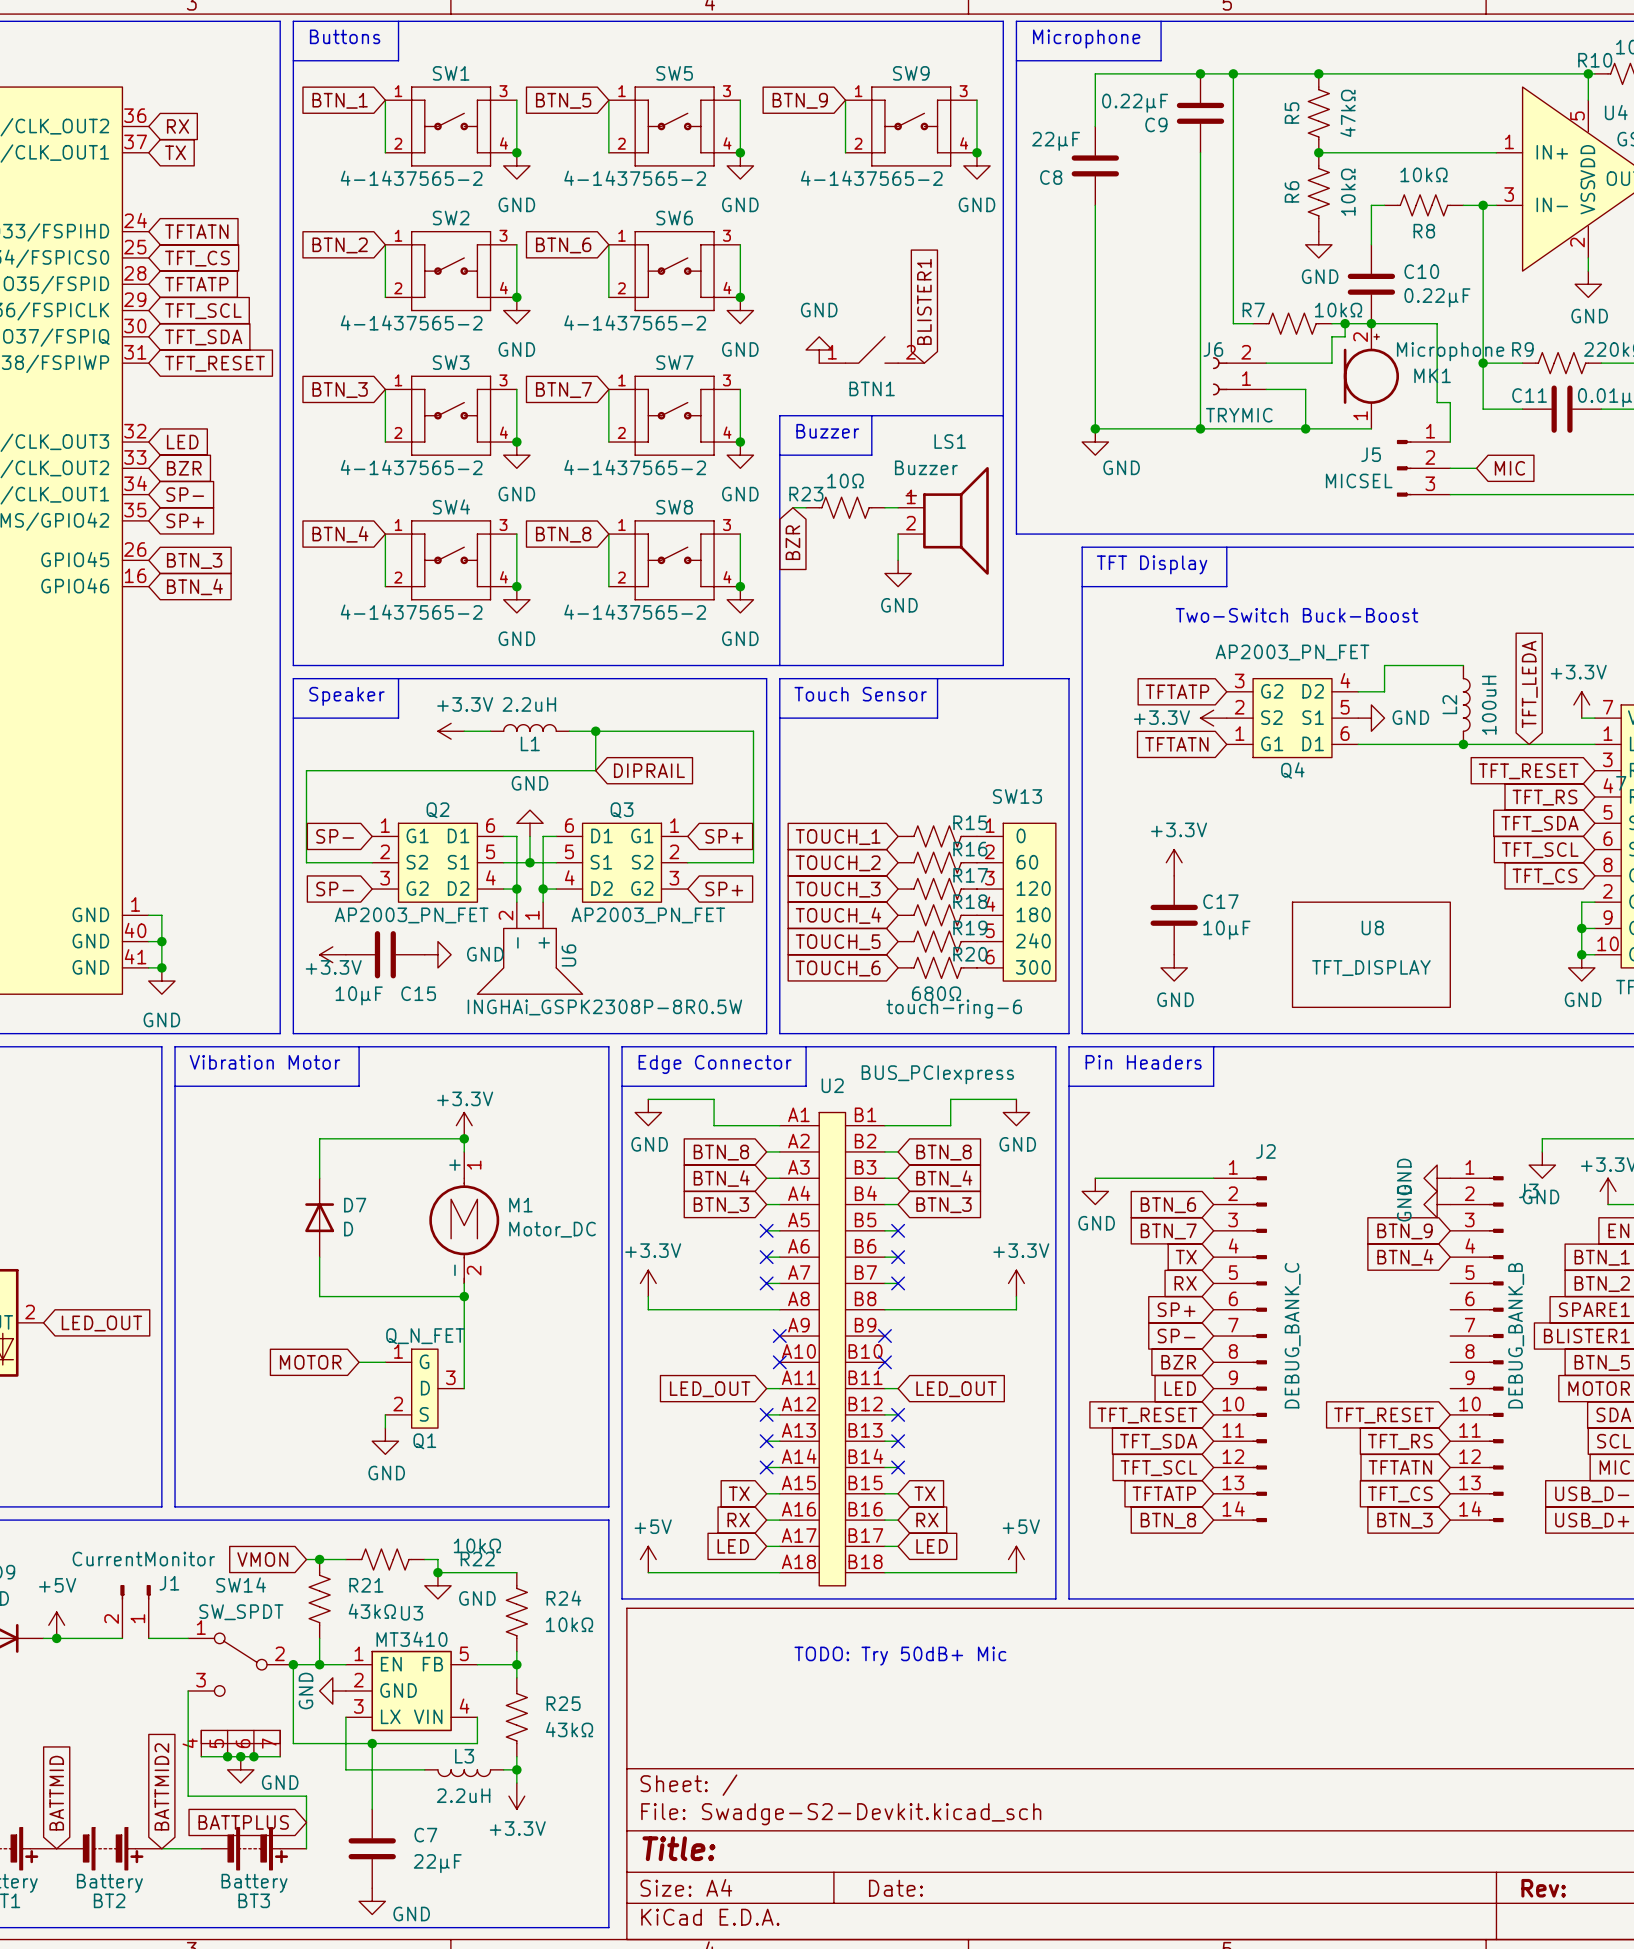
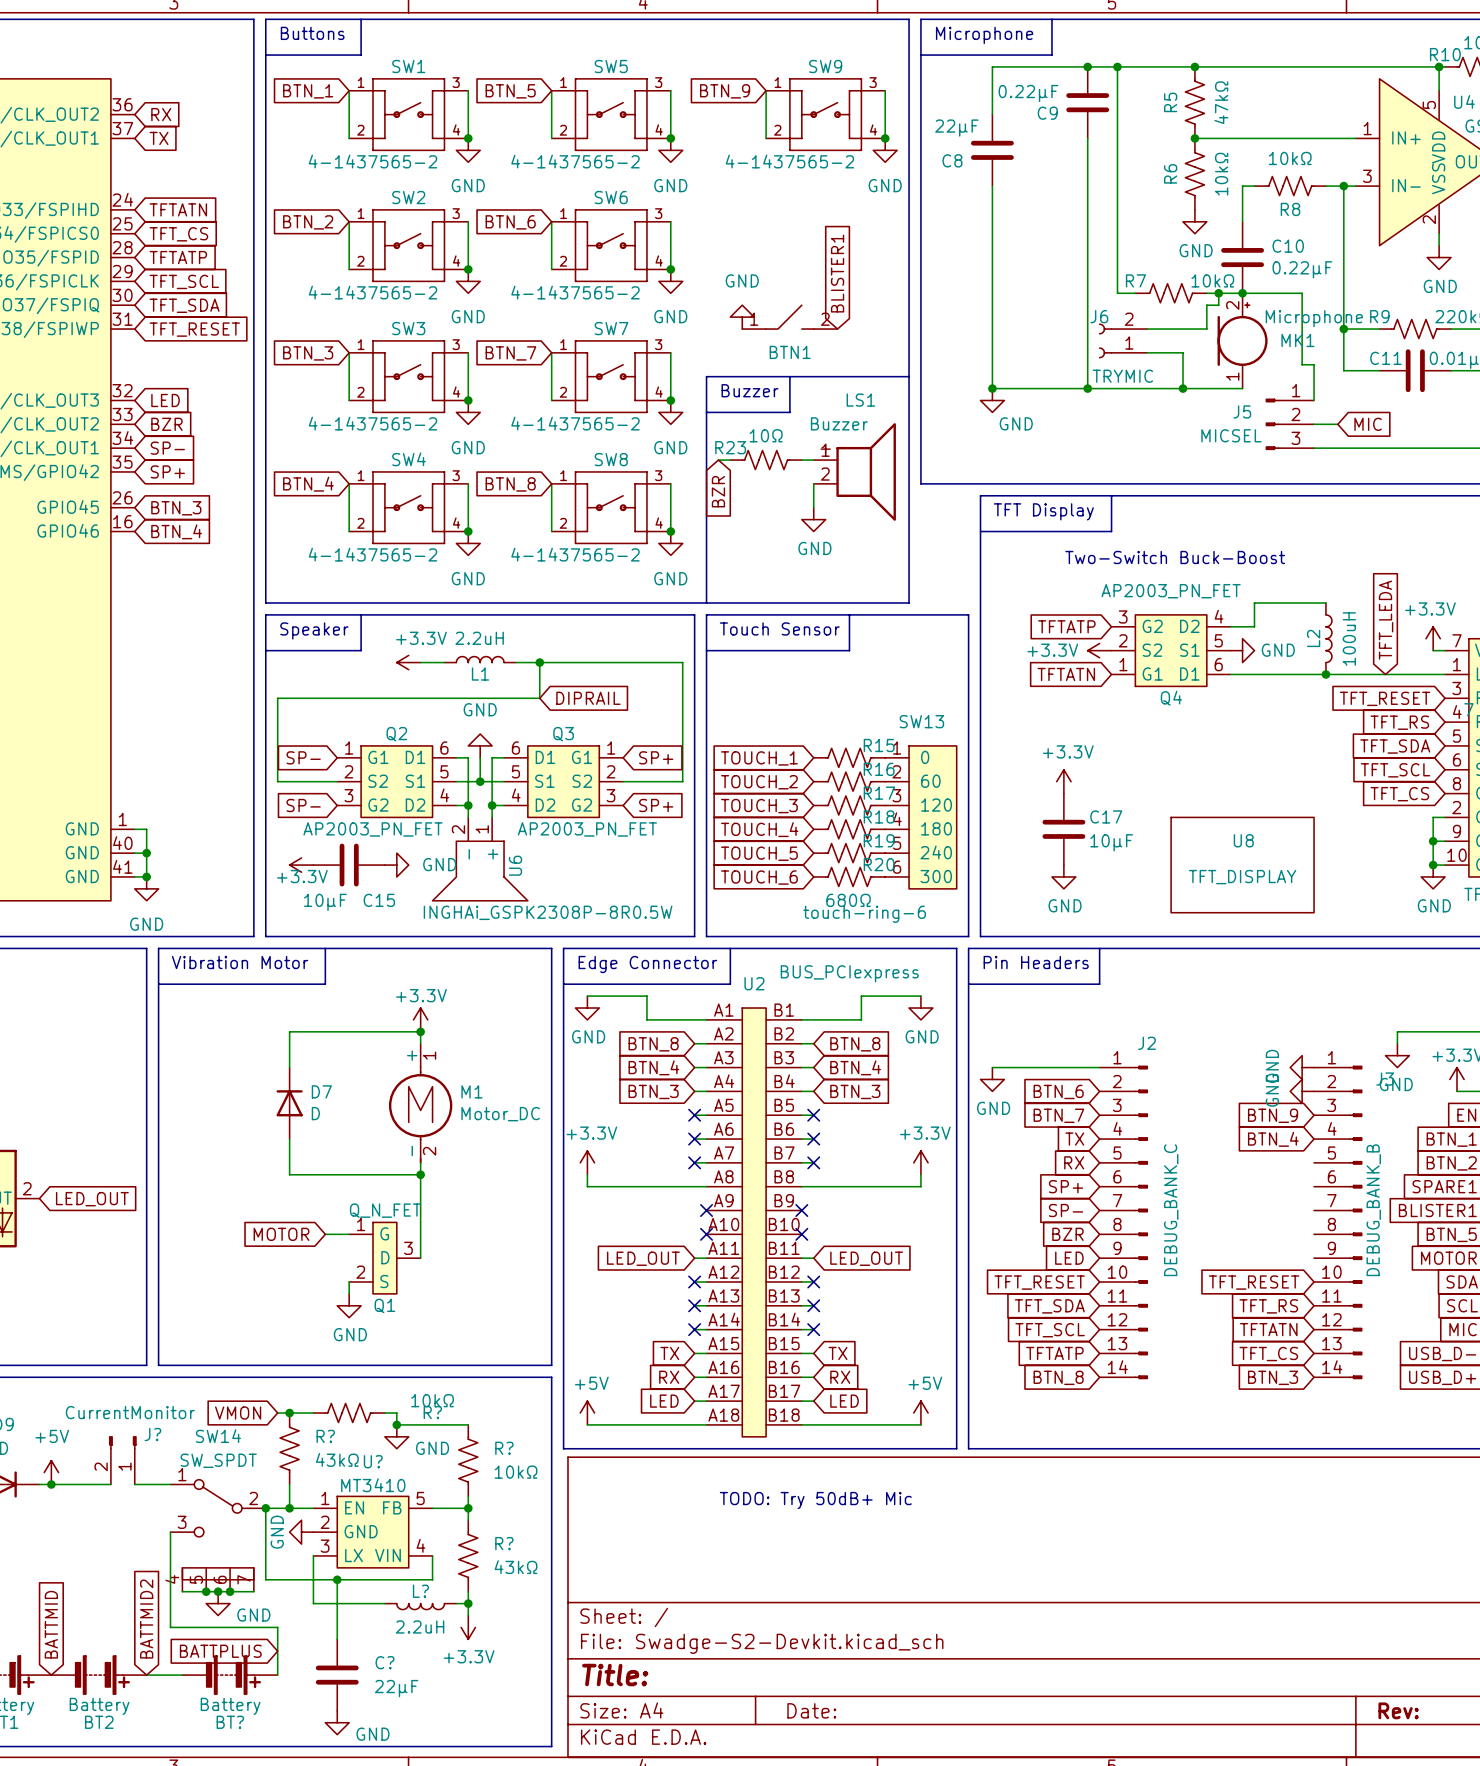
R22 name: R22 (477, 1559) -> R? (432, 1412)
J1 name: J1 (169, 1583) -> J? (152, 1434)
R21 name: R21 (366, 1585) -> R? (325, 1436)
R24 name: R24 (563, 1598) -> R? (504, 1448)
U3 name: U3 (411, 1613) -> U? (373, 1461)
R25 name: R25 (563, 1703) -> R? (504, 1543)
L3 name: L3 (464, 1756) -> L? (420, 1591)
C7 name: C7 (425, 1835) -> C? (384, 1662)
BT3 name: BT3 (254, 1900) -> BT? (230, 1722)

